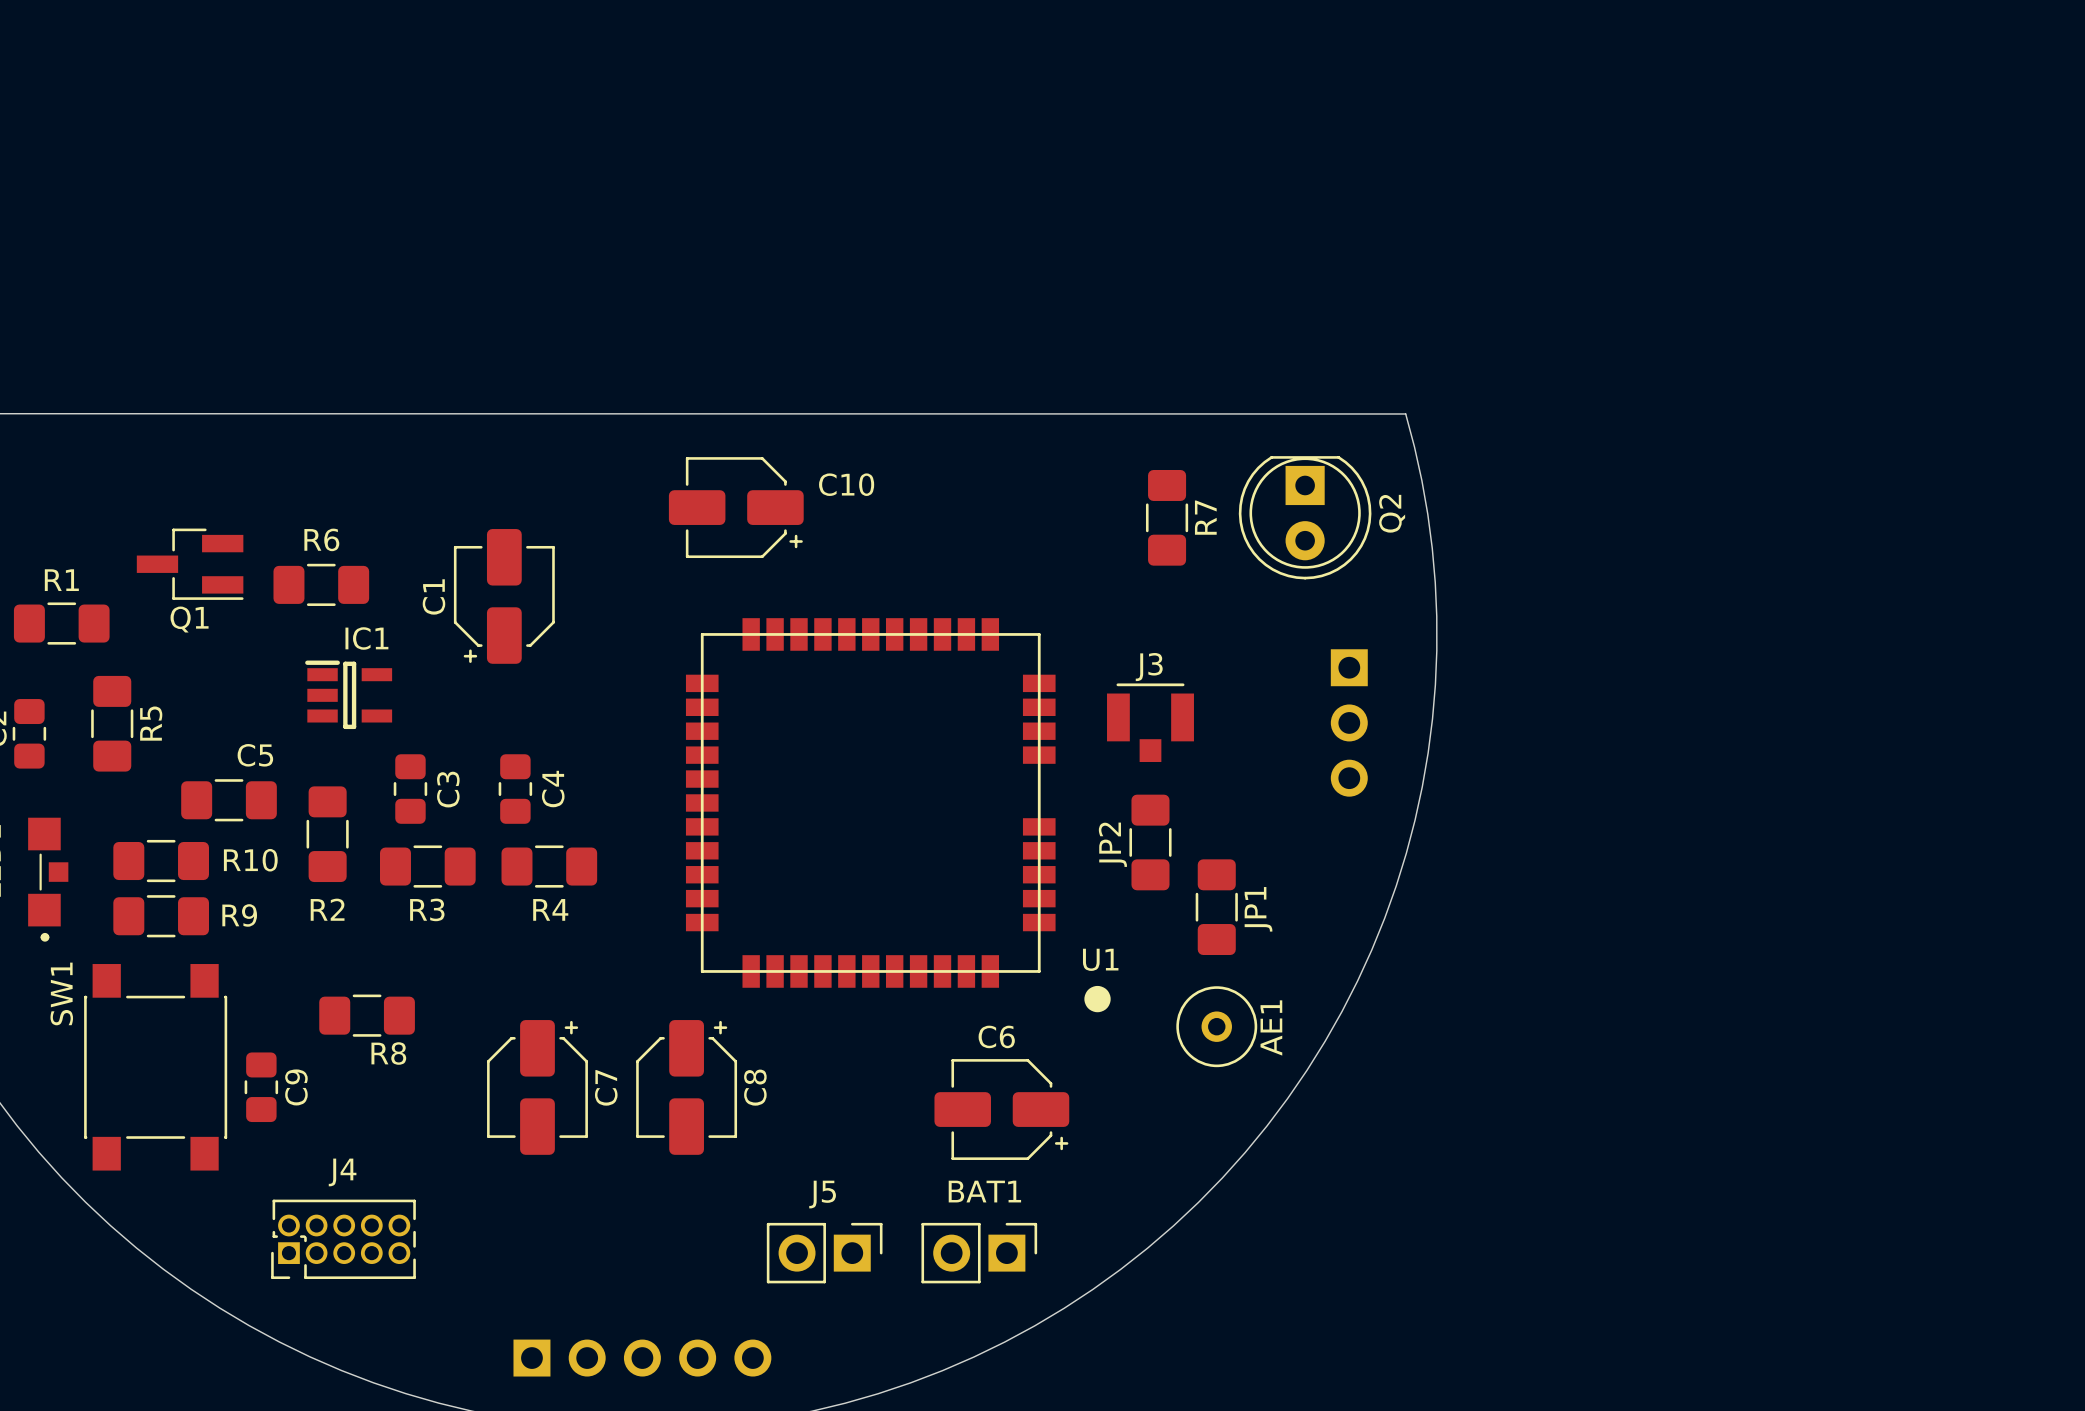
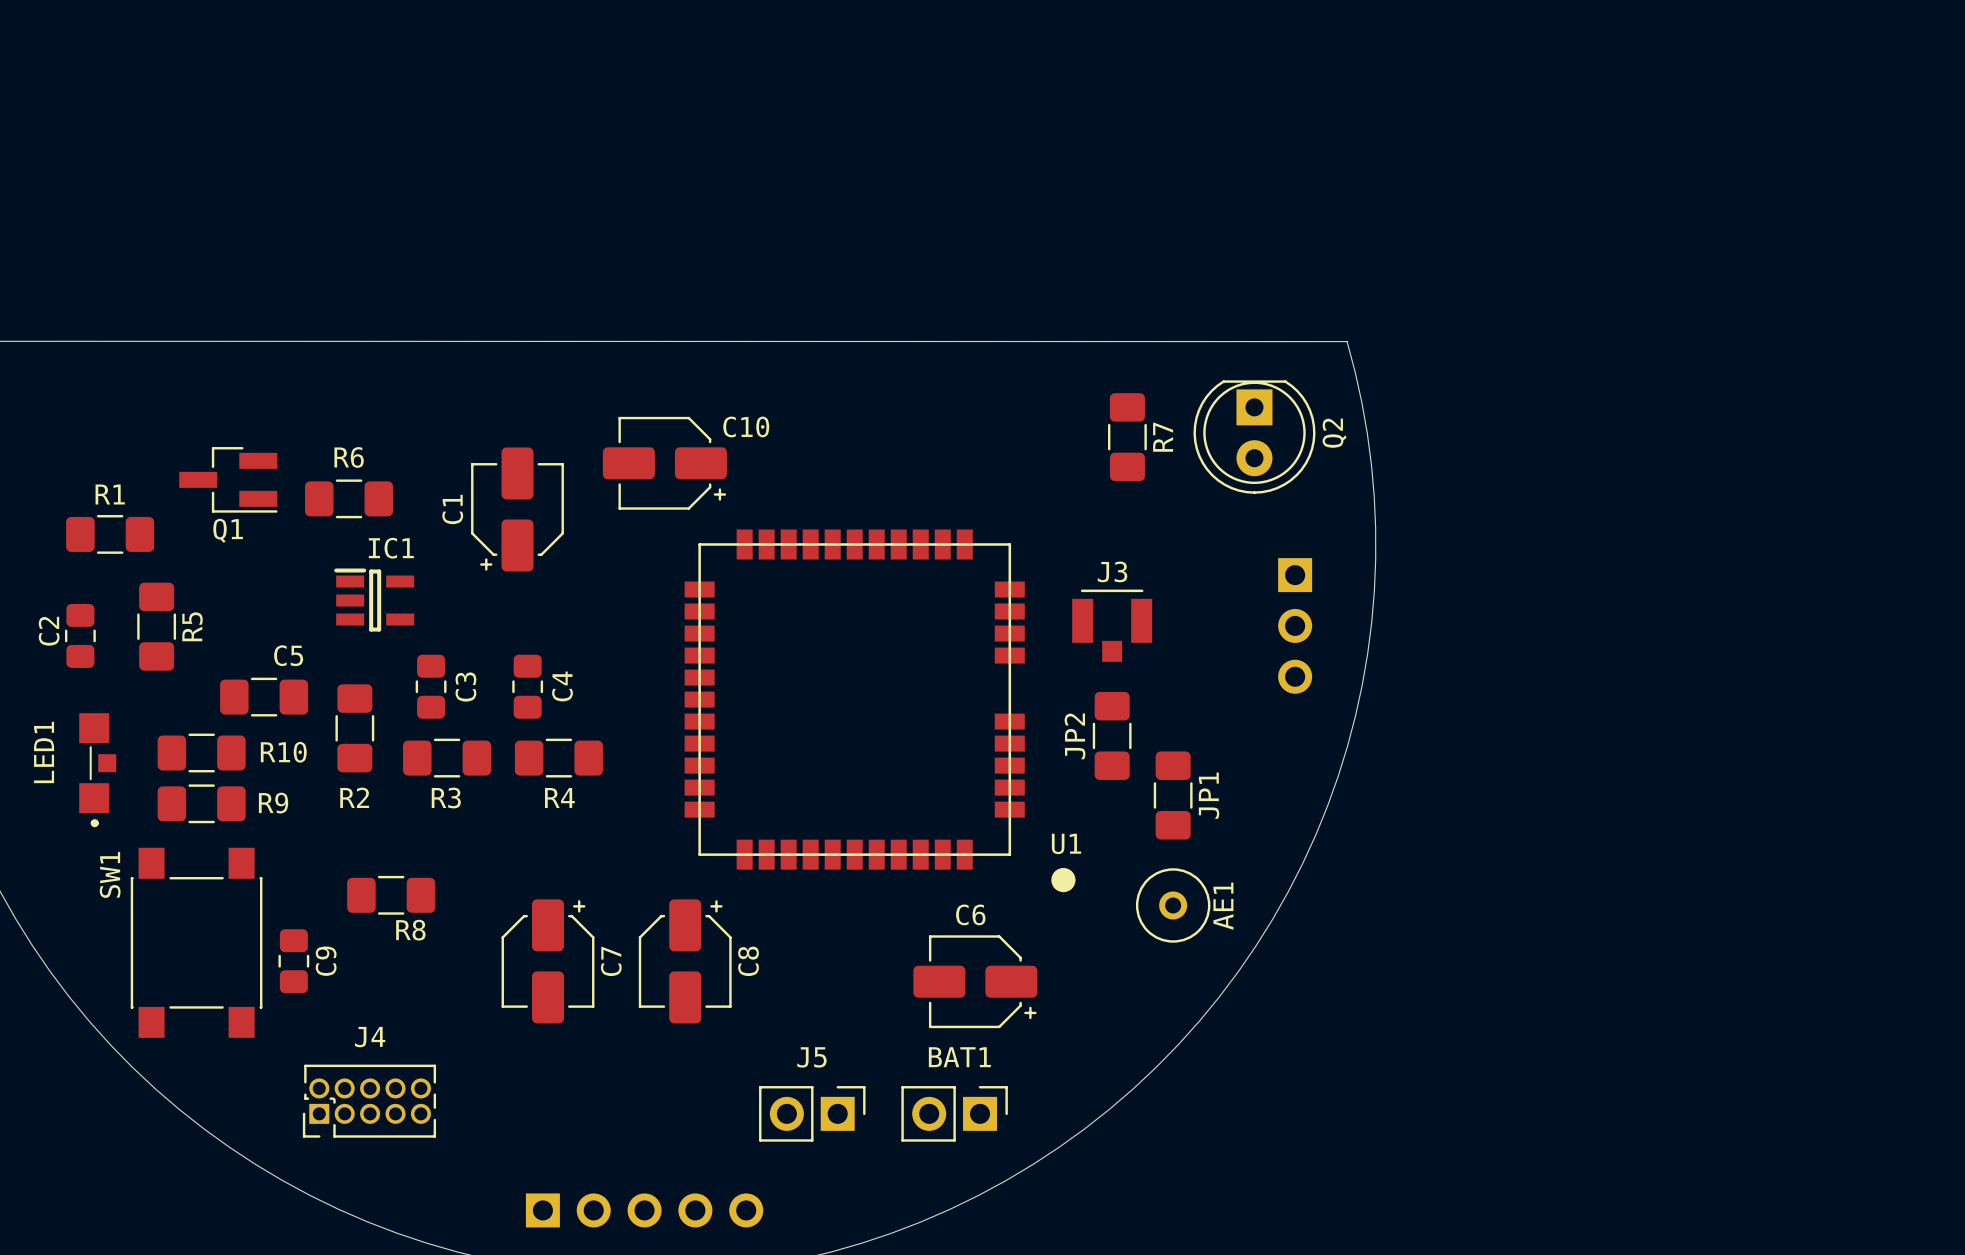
C10 name position: C10 (846, 484) -> C10 (746, 426)
C10 position: (736, 507) -> (664, 463)

